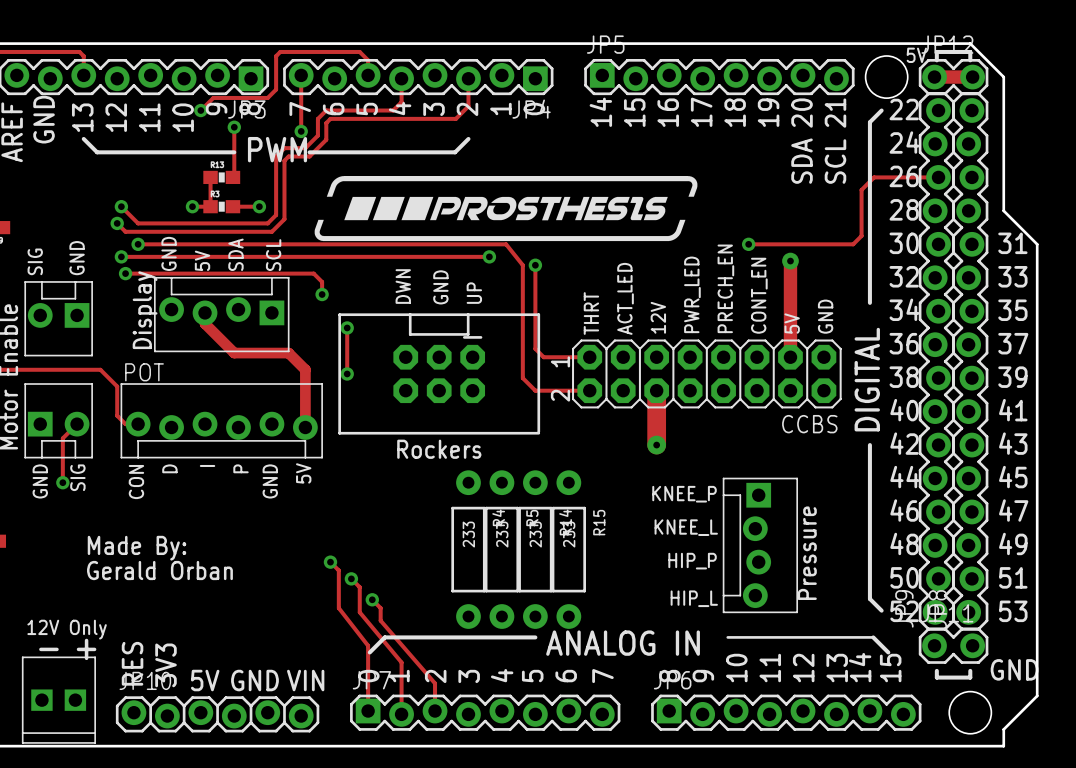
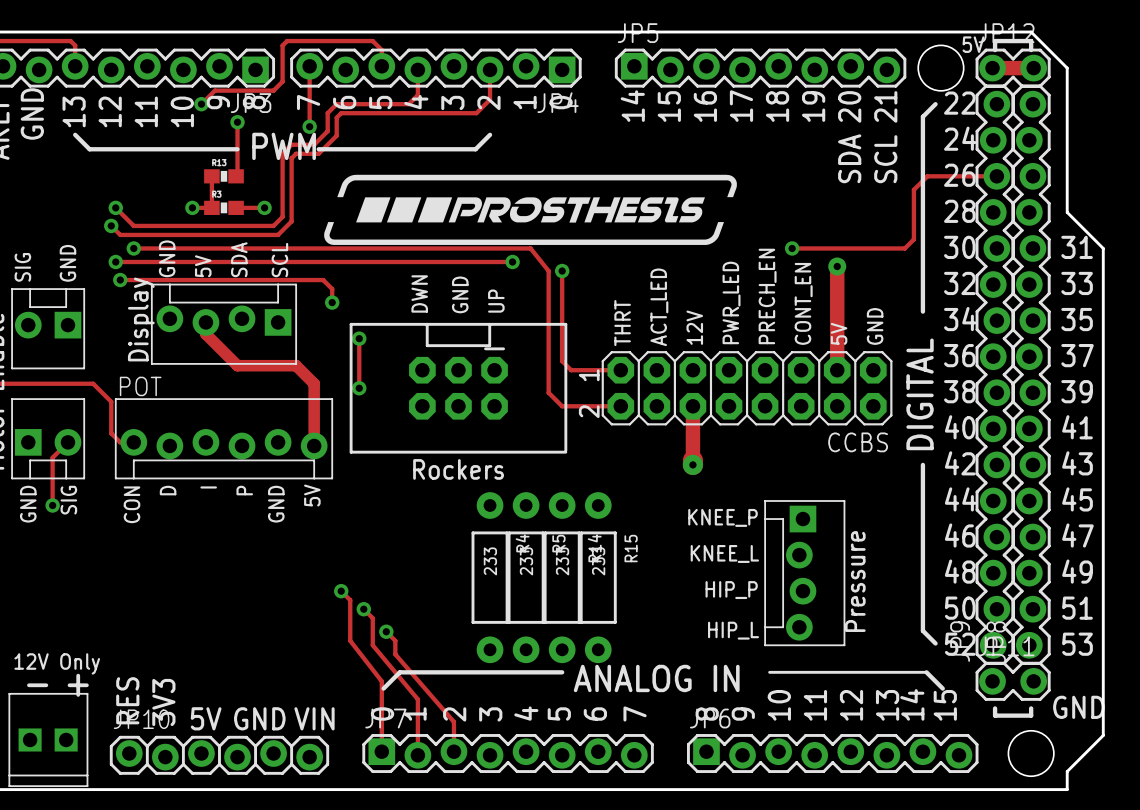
track width: thick (656, 390) (656, 440) -> thin (692, 406) (692, 460)
text: Made By: (137, 548) -> none
text: Gerald Orban (159, 570) -> none

